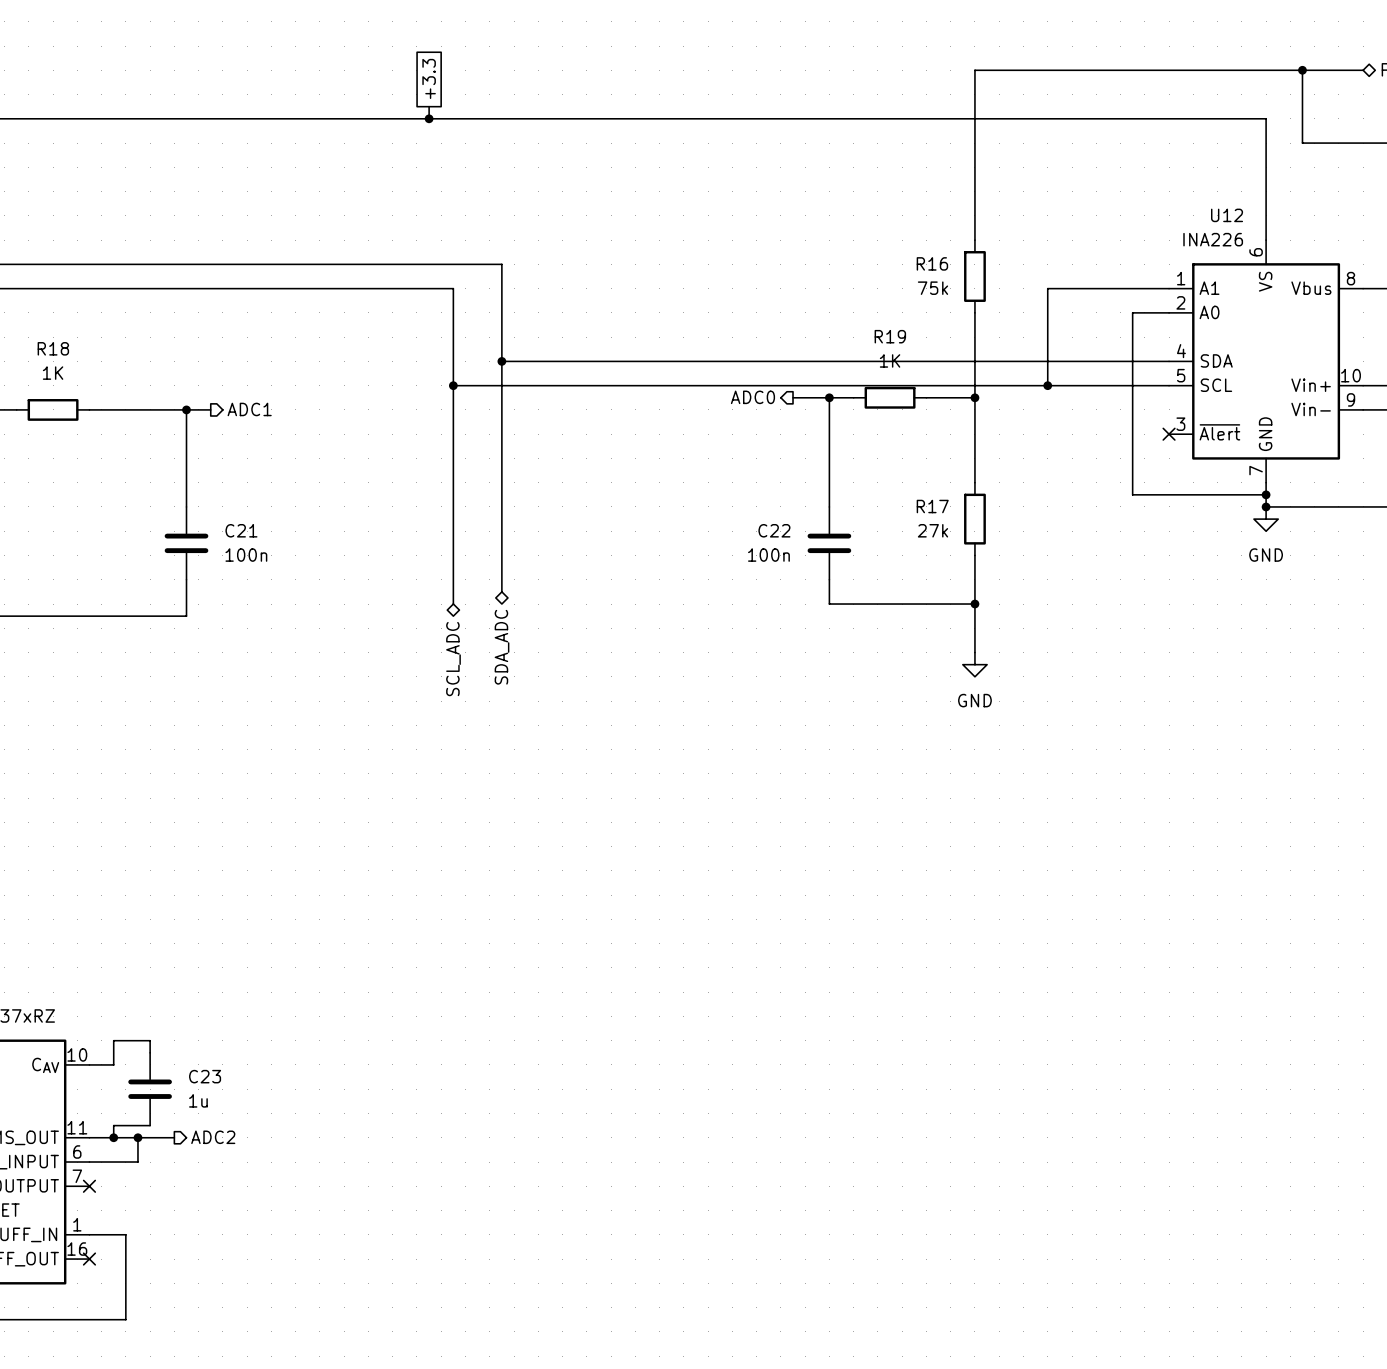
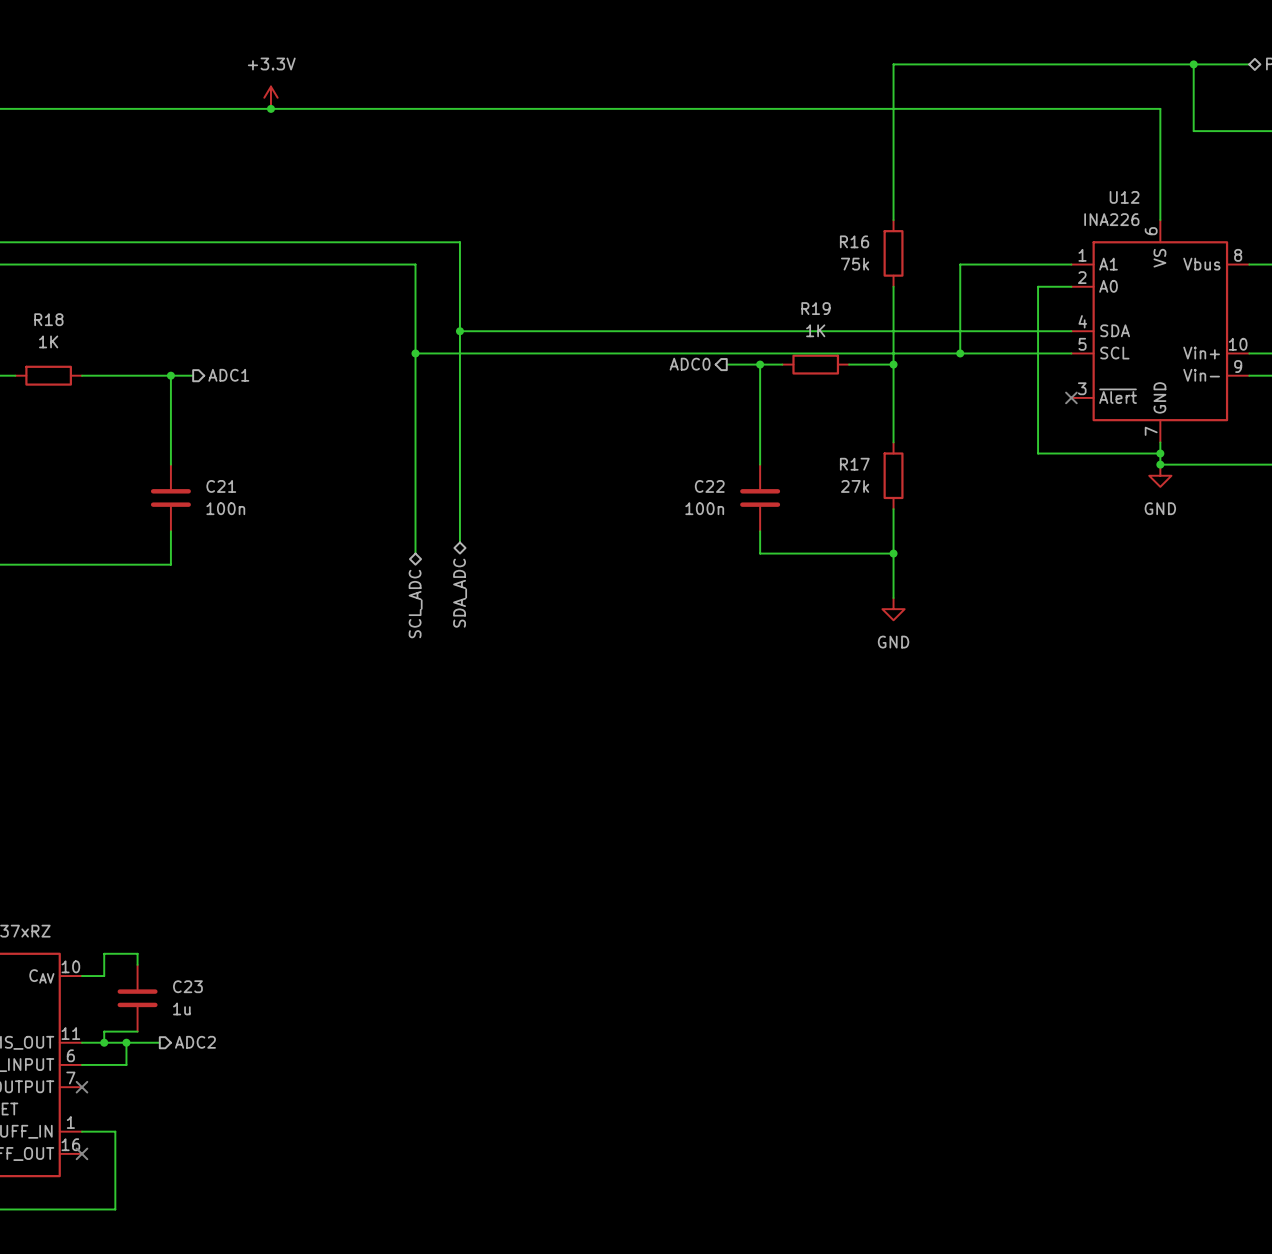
global label: +3.3 (429, 78) -> none
power symbol: none -> +3.3V (270, 97)
wire: (429, 106) (429, 118) -> none
junction: none -> (270, 108)
junction: (429, 118) -> none

